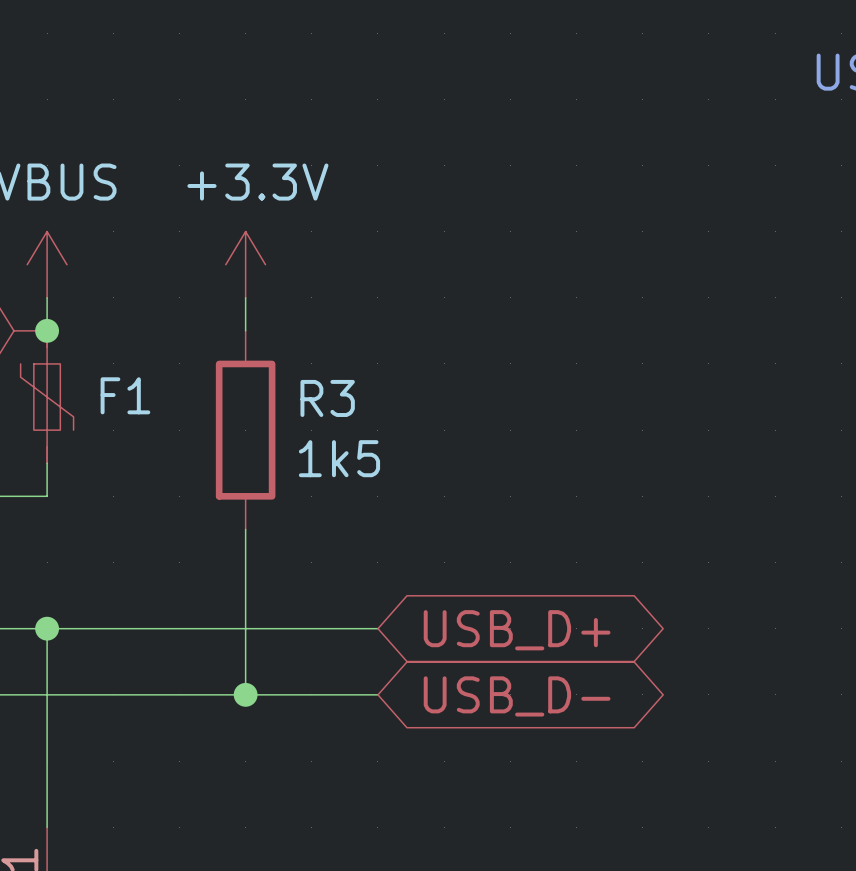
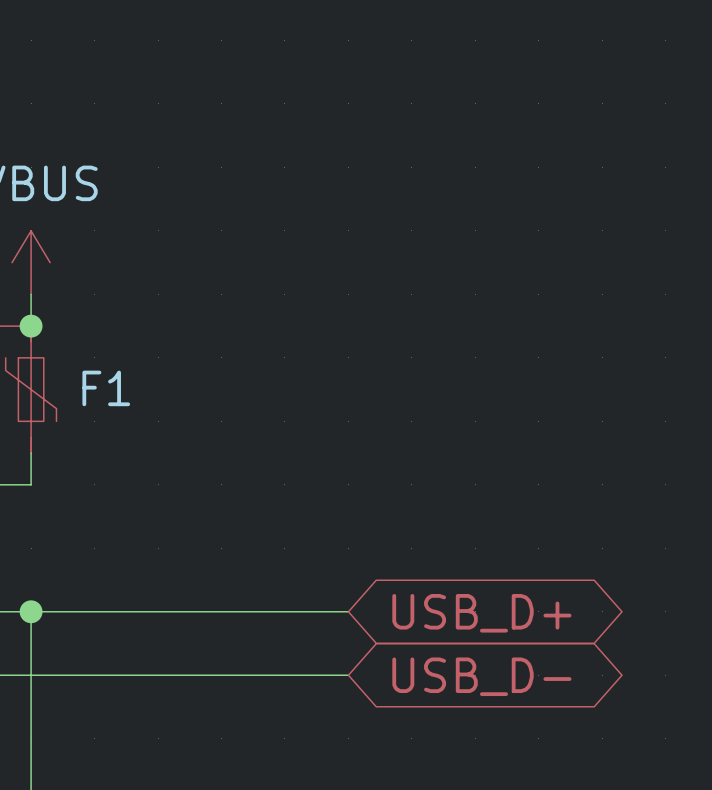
power symbol: +3.3V (245, 264) -> none
wire: (245, 297) (245, 330) -> none
R3: 1k5 (245, 430) -> none
wire: (245, 529) (245, 694) -> none
junction: (245, 694) -> none

